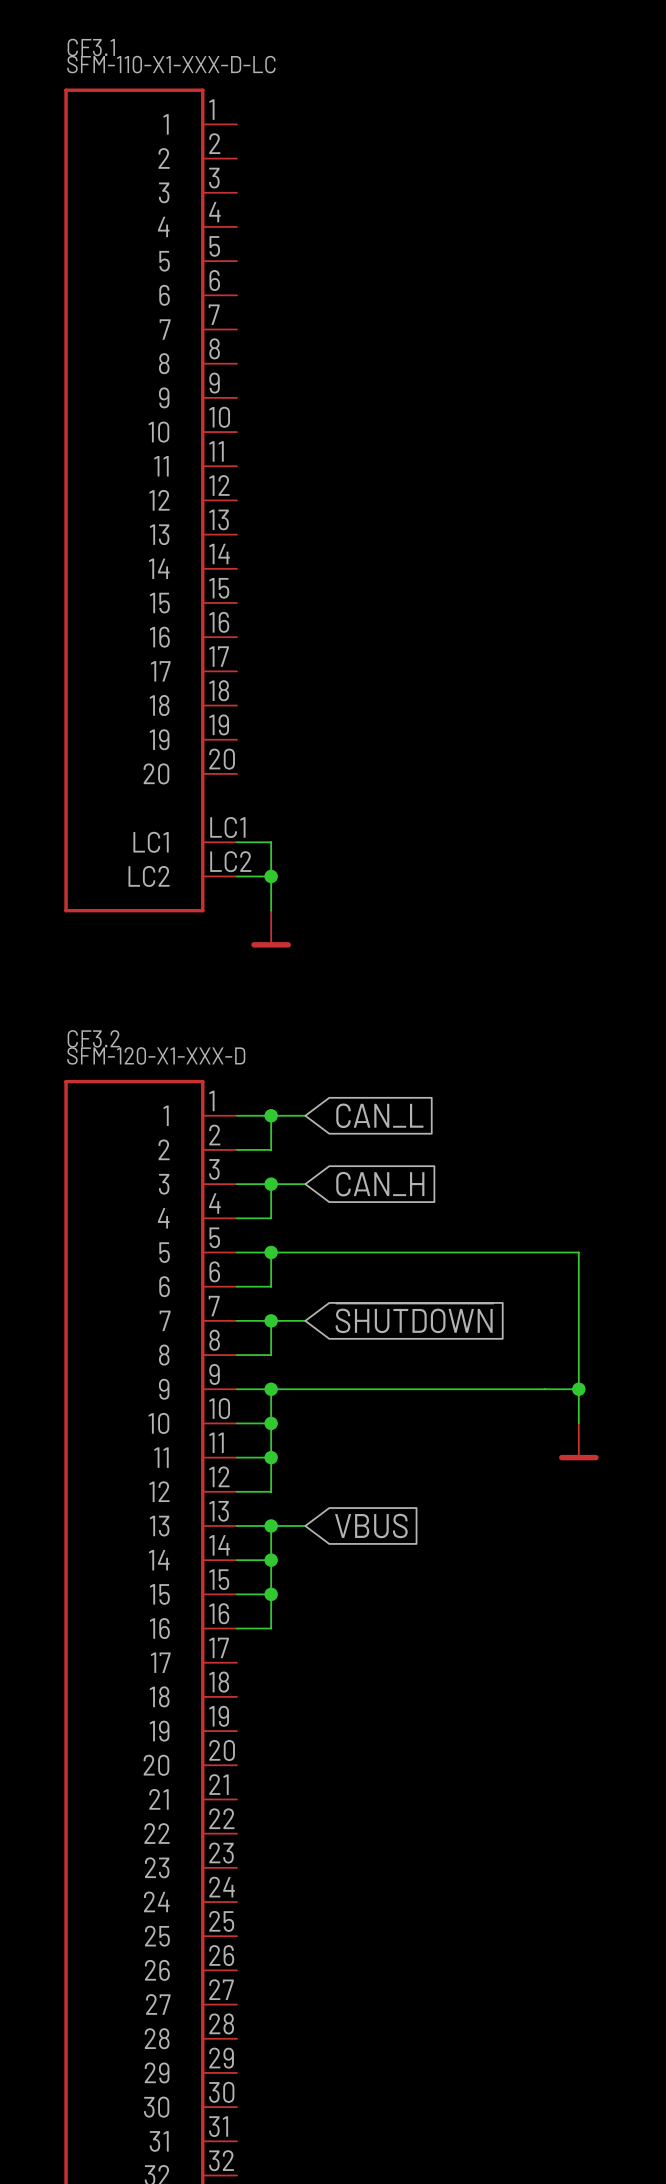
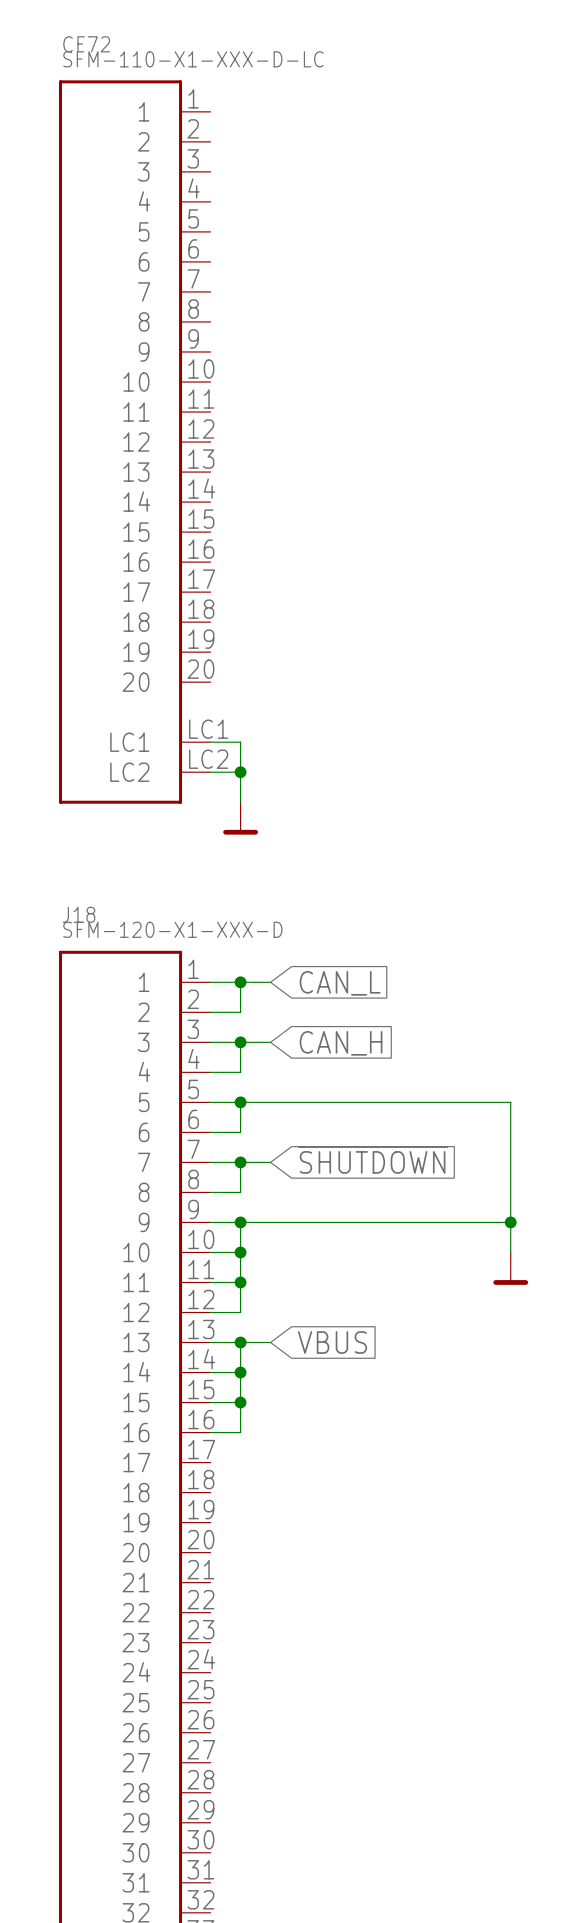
CF3.1 name: CF3.1 (91, 47) -> CF72 (86, 44)
CF3.2 name: CF3.2 (93, 1038) -> J18 (78, 914)

